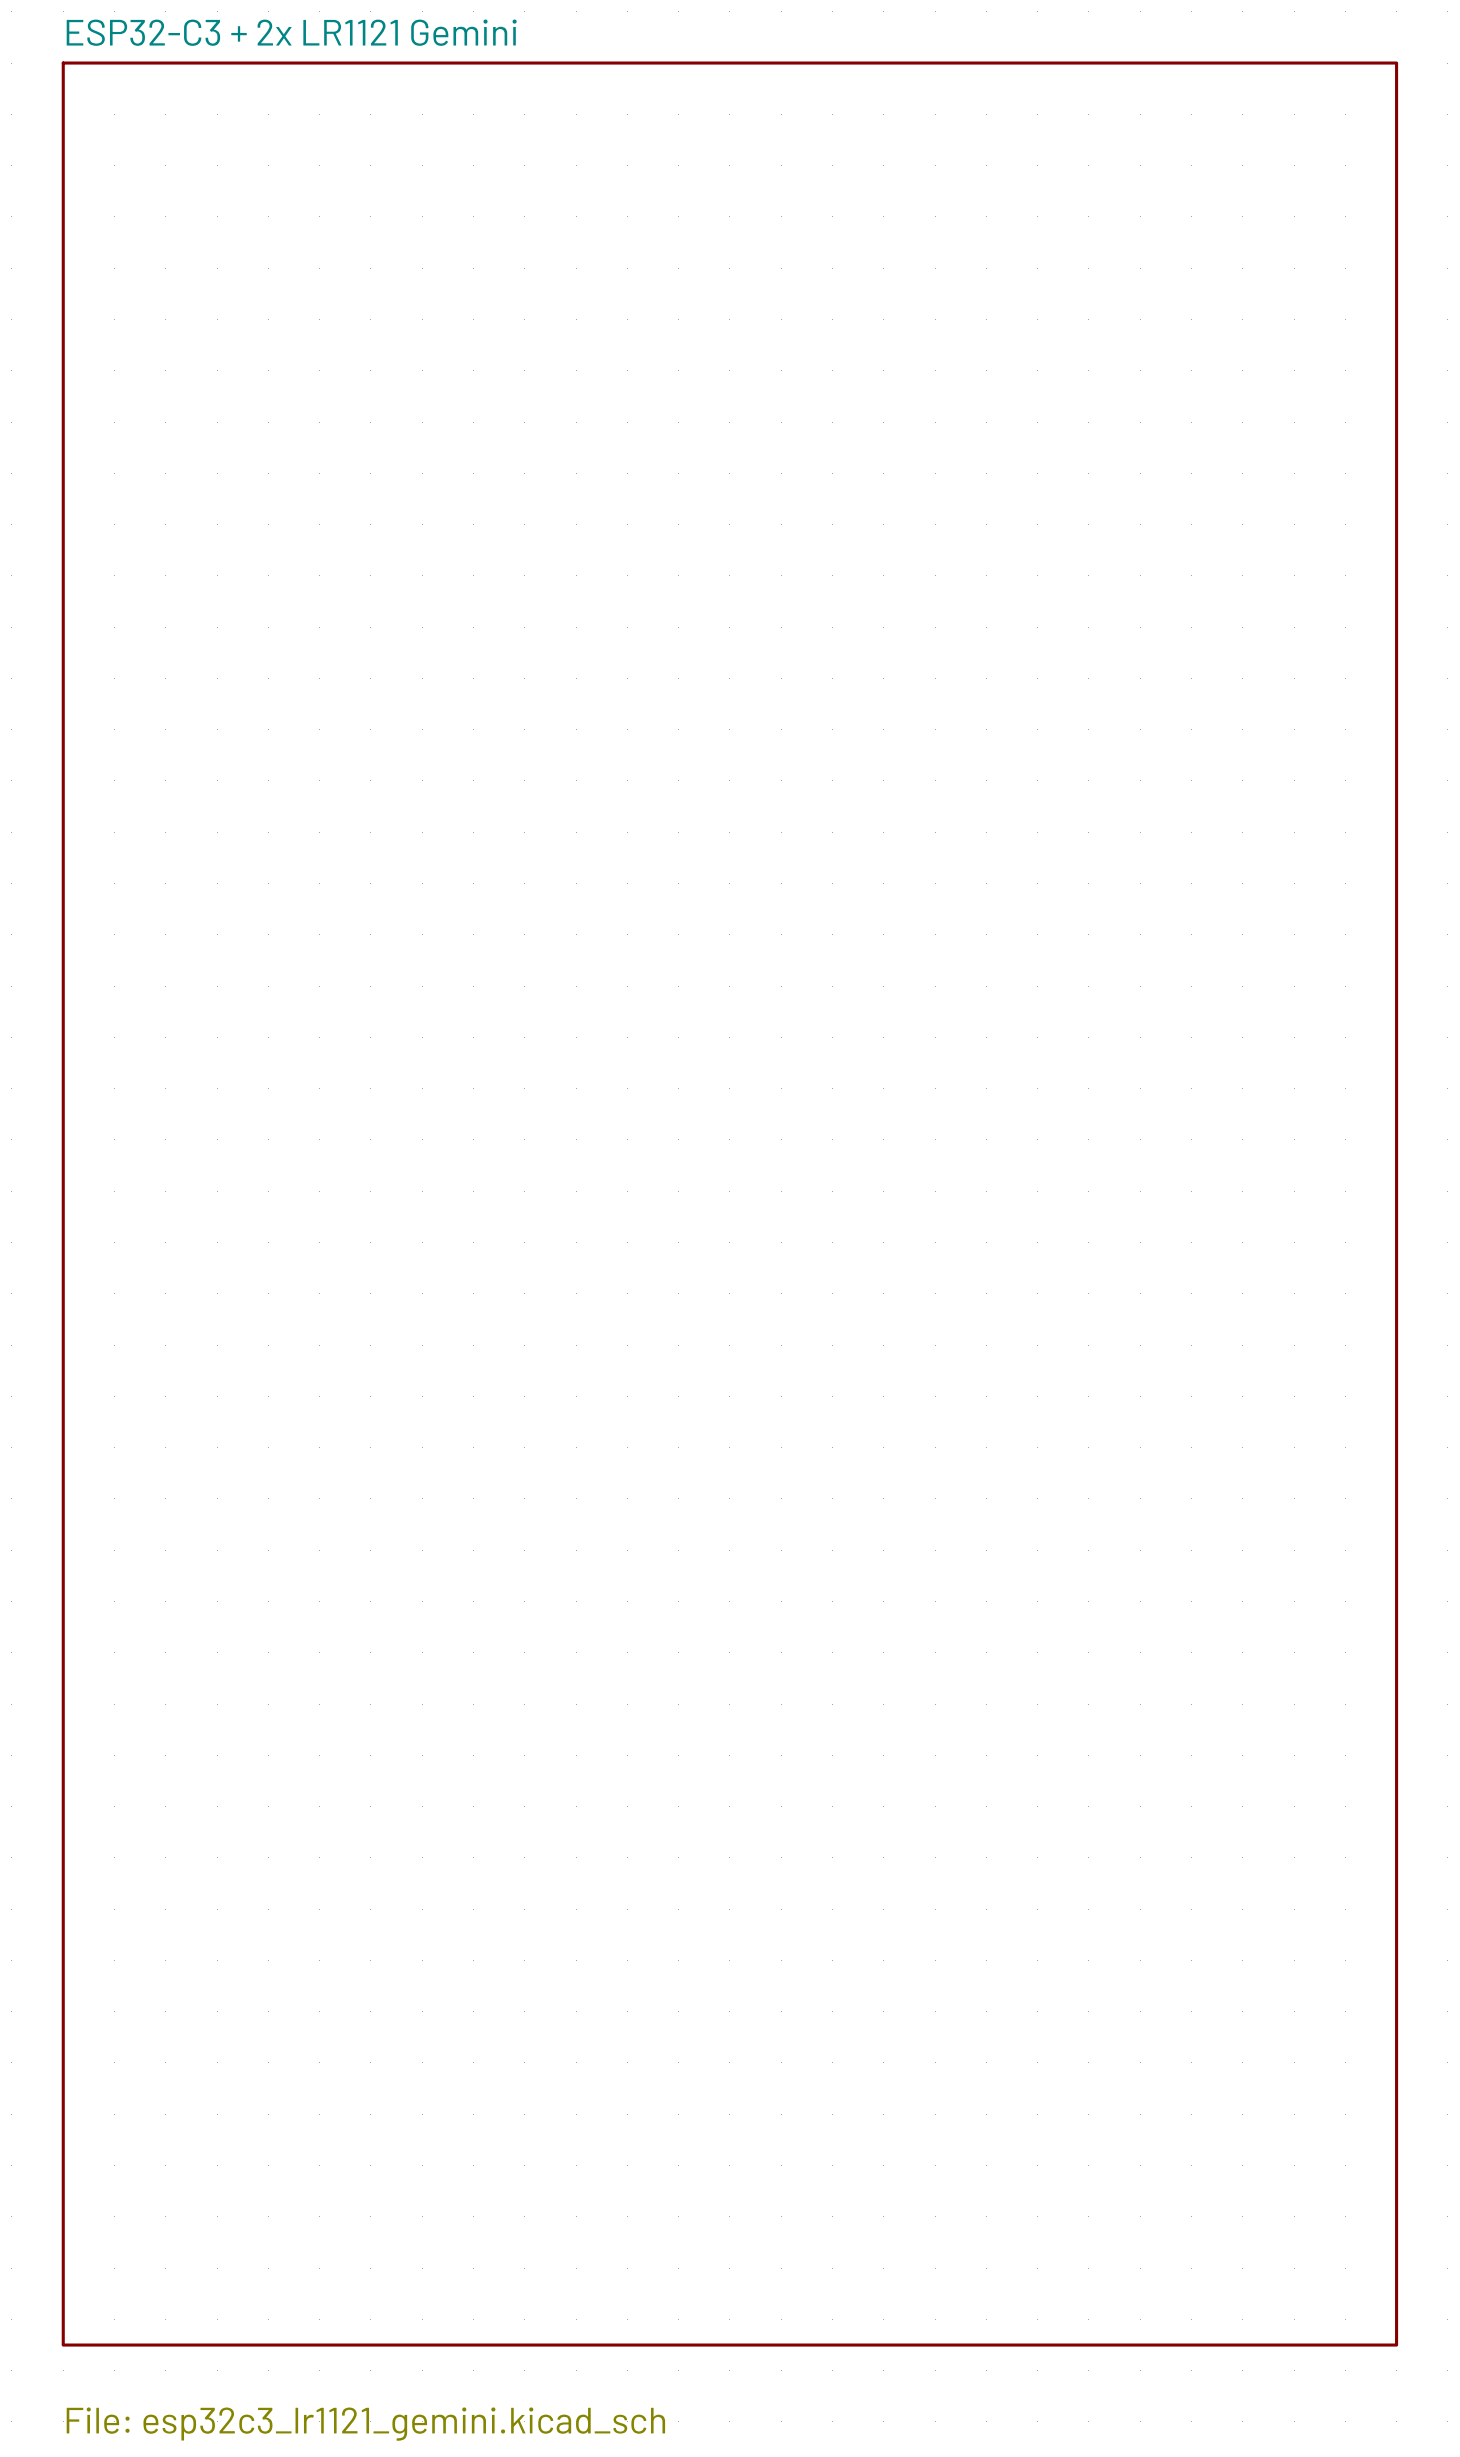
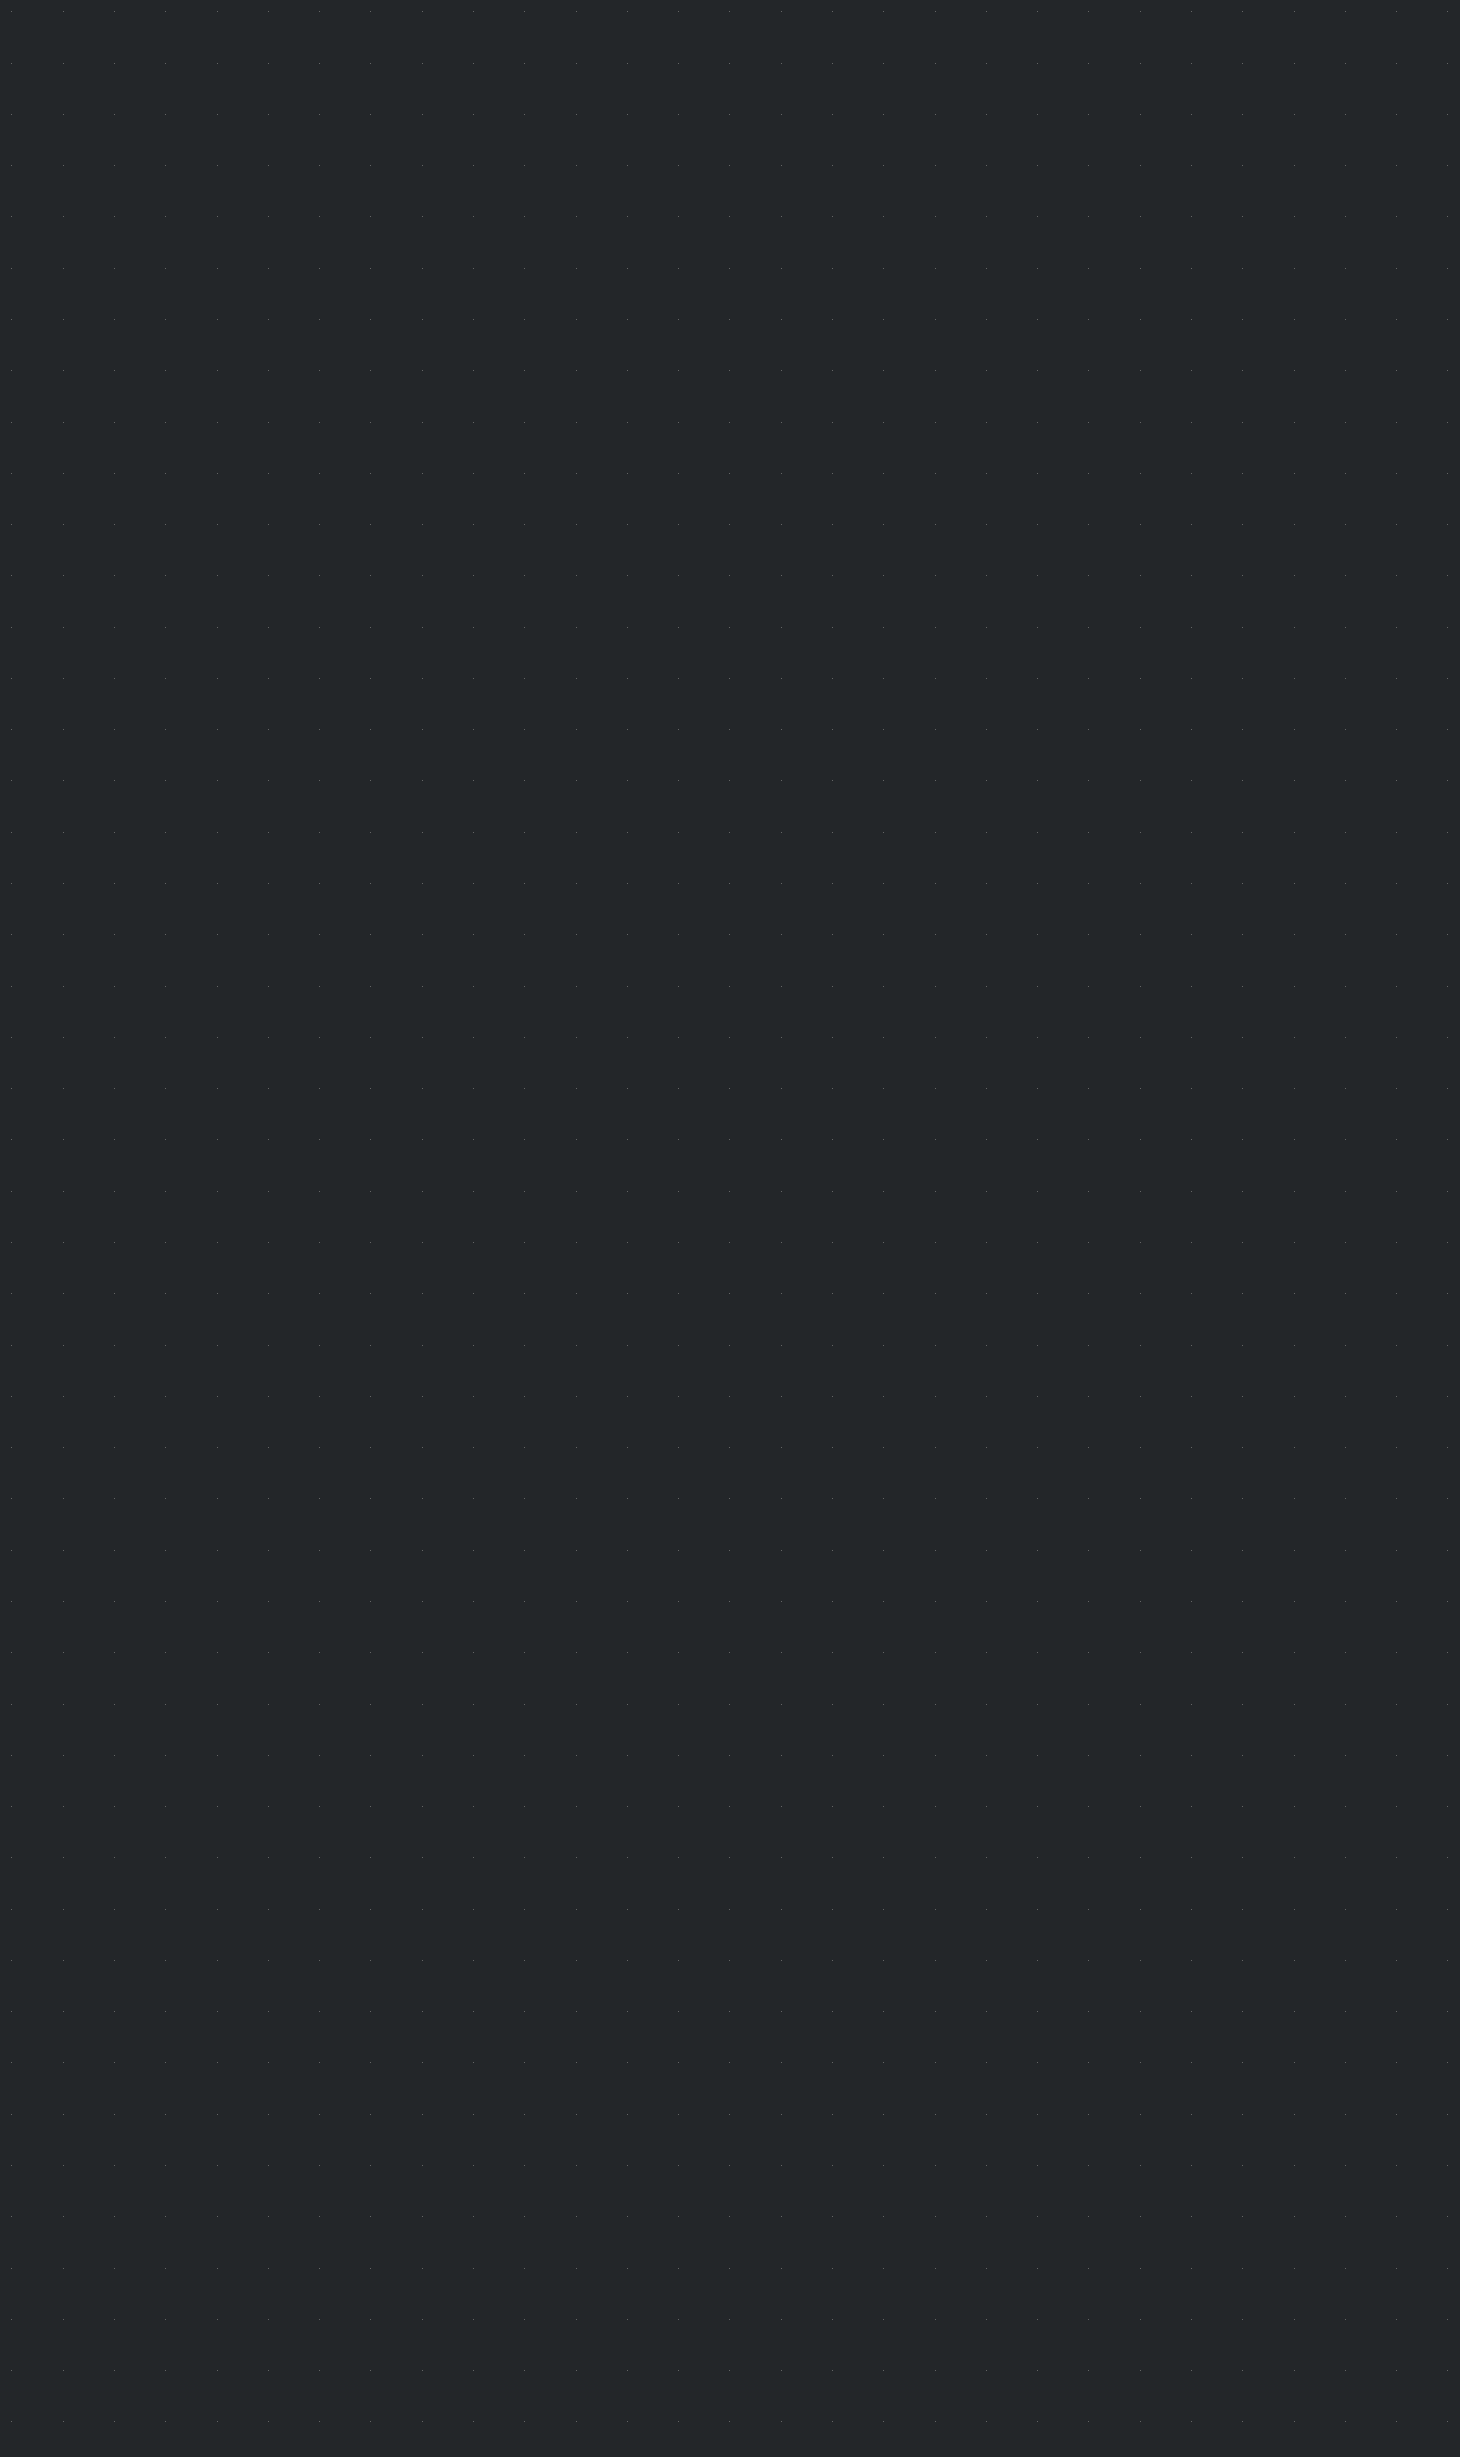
sheet ESP32-C3 + 2x LR1121 Gemini: File: esp32c3_lr1121_gemini.kicad_sch (729, 1204) -> none

